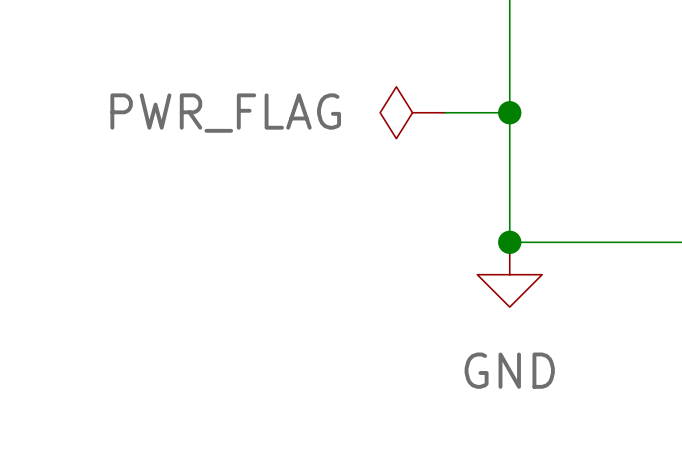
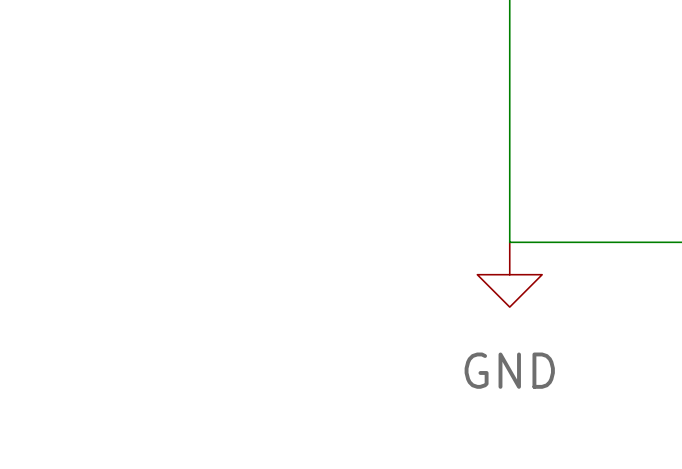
power symbol: PWR_FLAG (412, 112) -> none
wire: (444, 112) (509, 112) -> none
junction: (509, 112) -> none
junction: (509, 242) -> none

